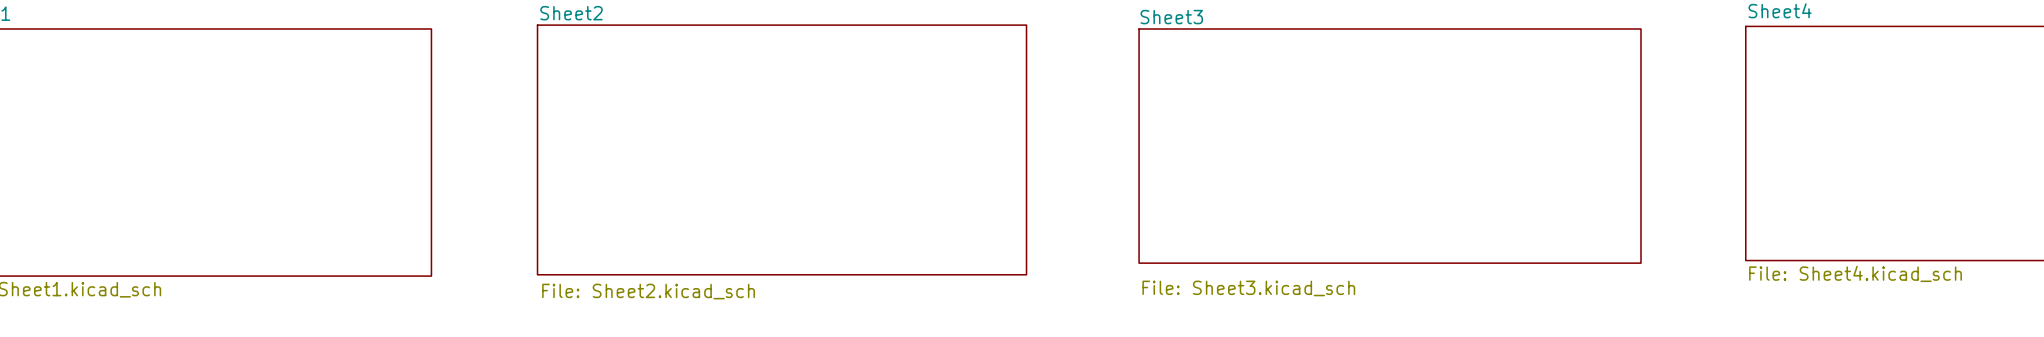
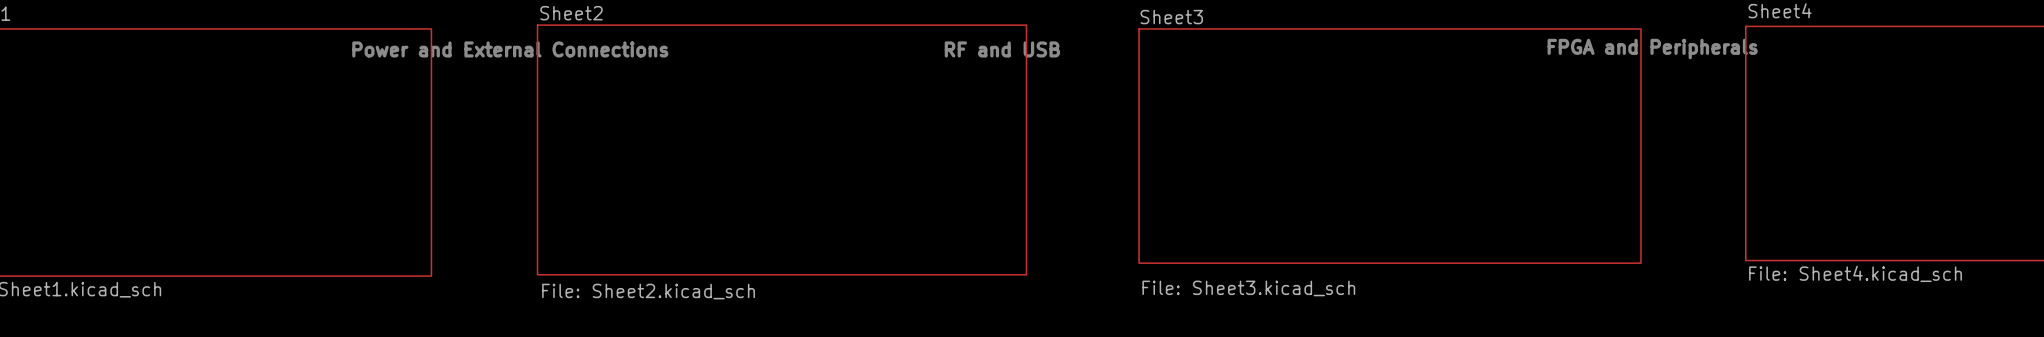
text: none -> Power and External Connections (510, 49)
text: none -> RF and USB (1002, 49)
text: none -> FPGA and Peripherals (1652, 49)

